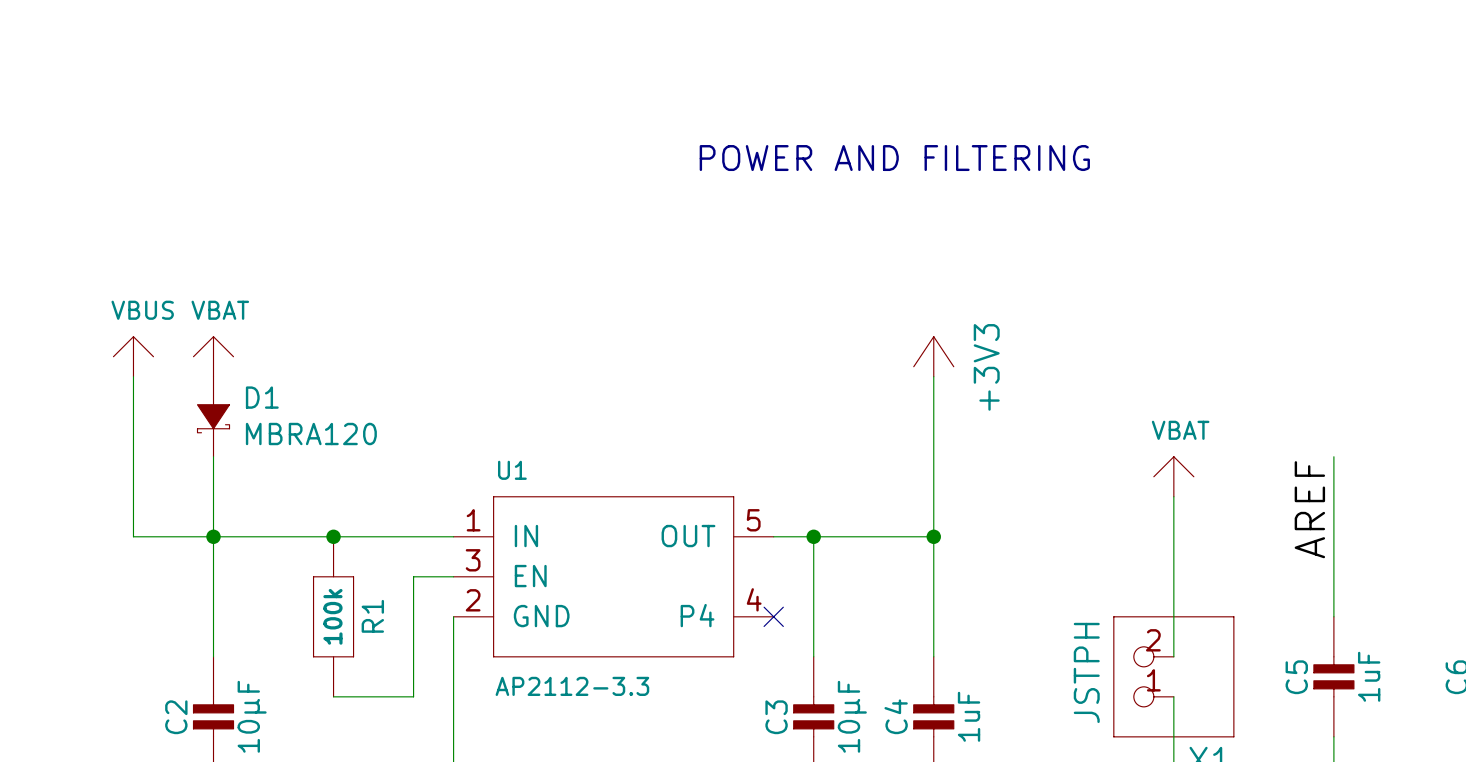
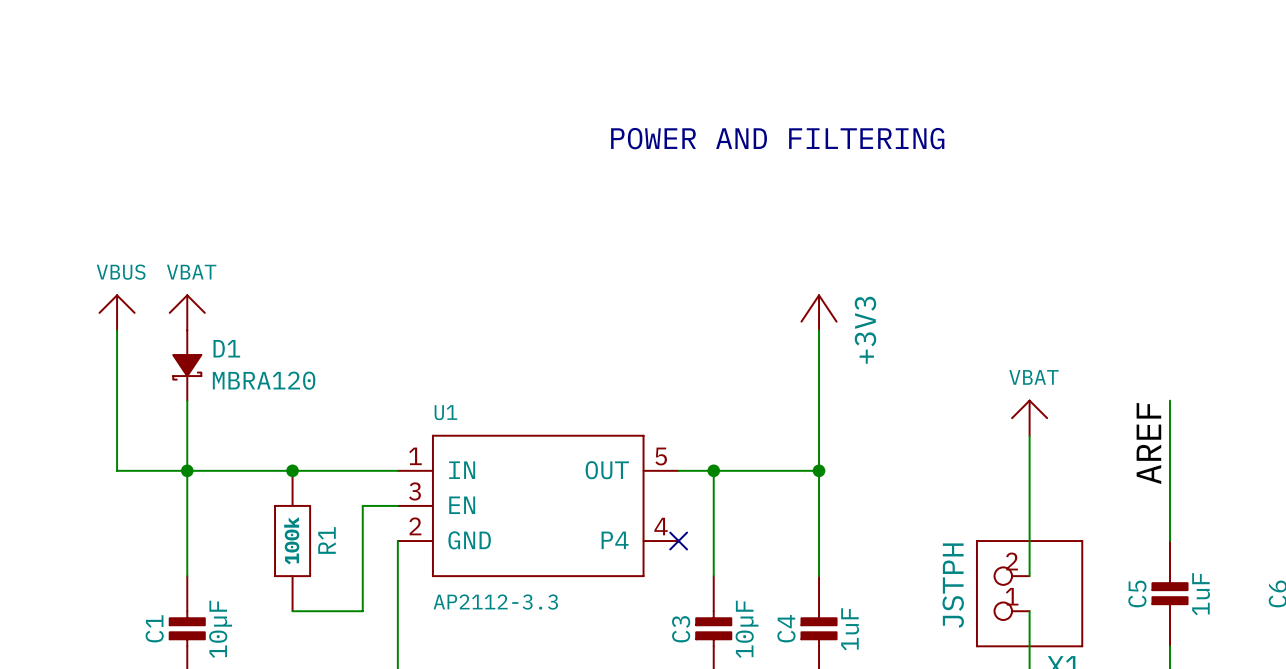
C2 name: C2 (176, 717) -> C1 (154, 628)

